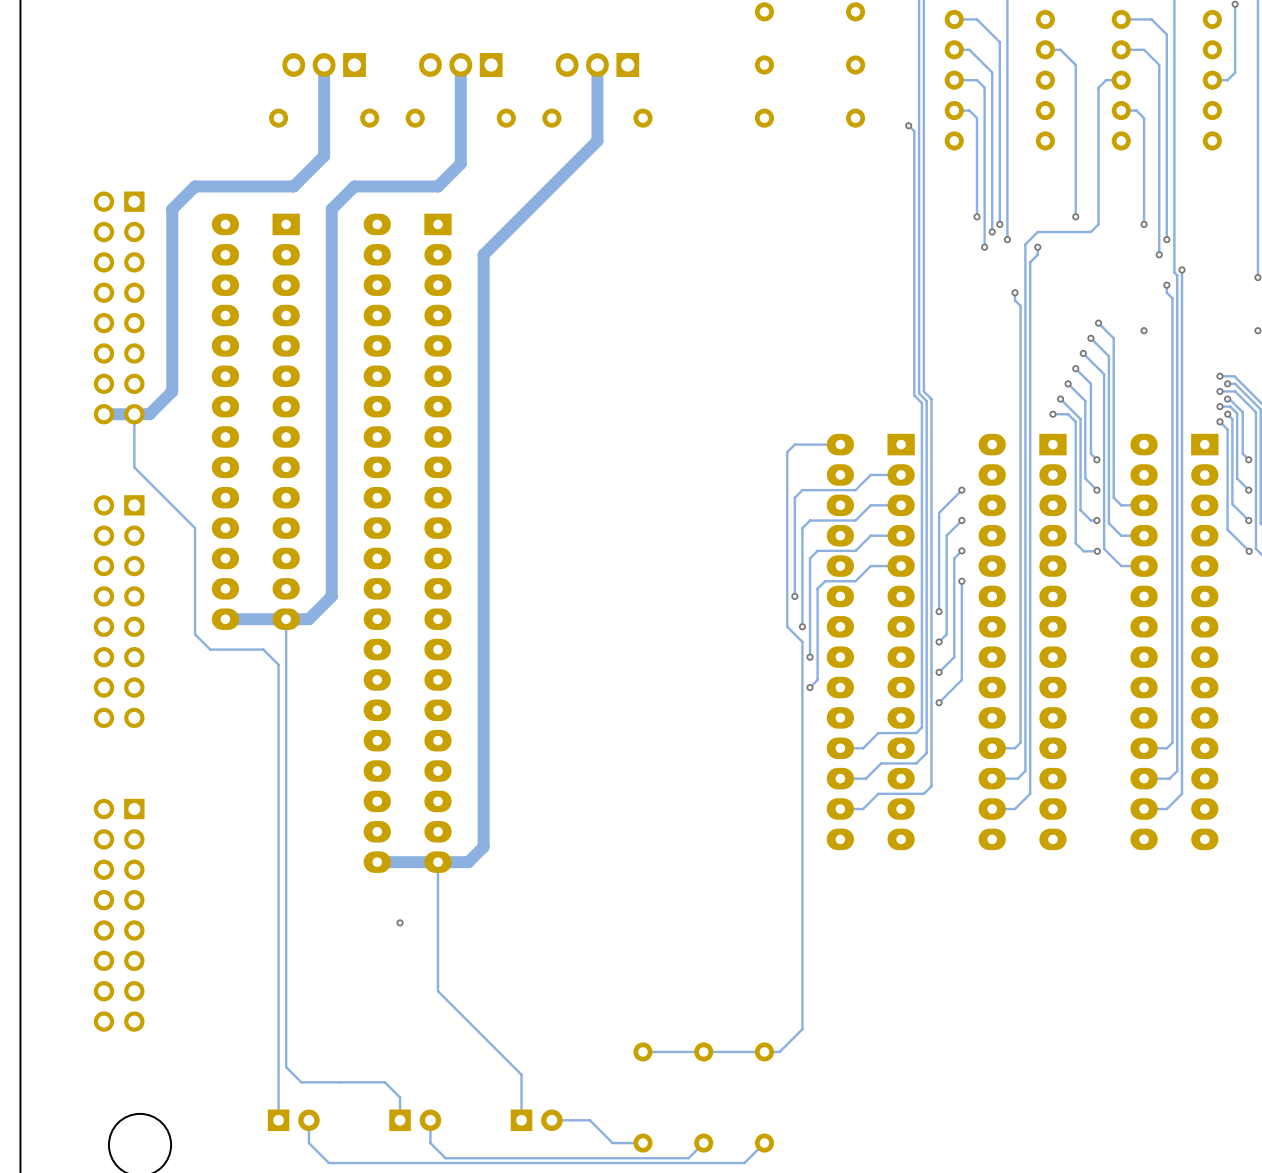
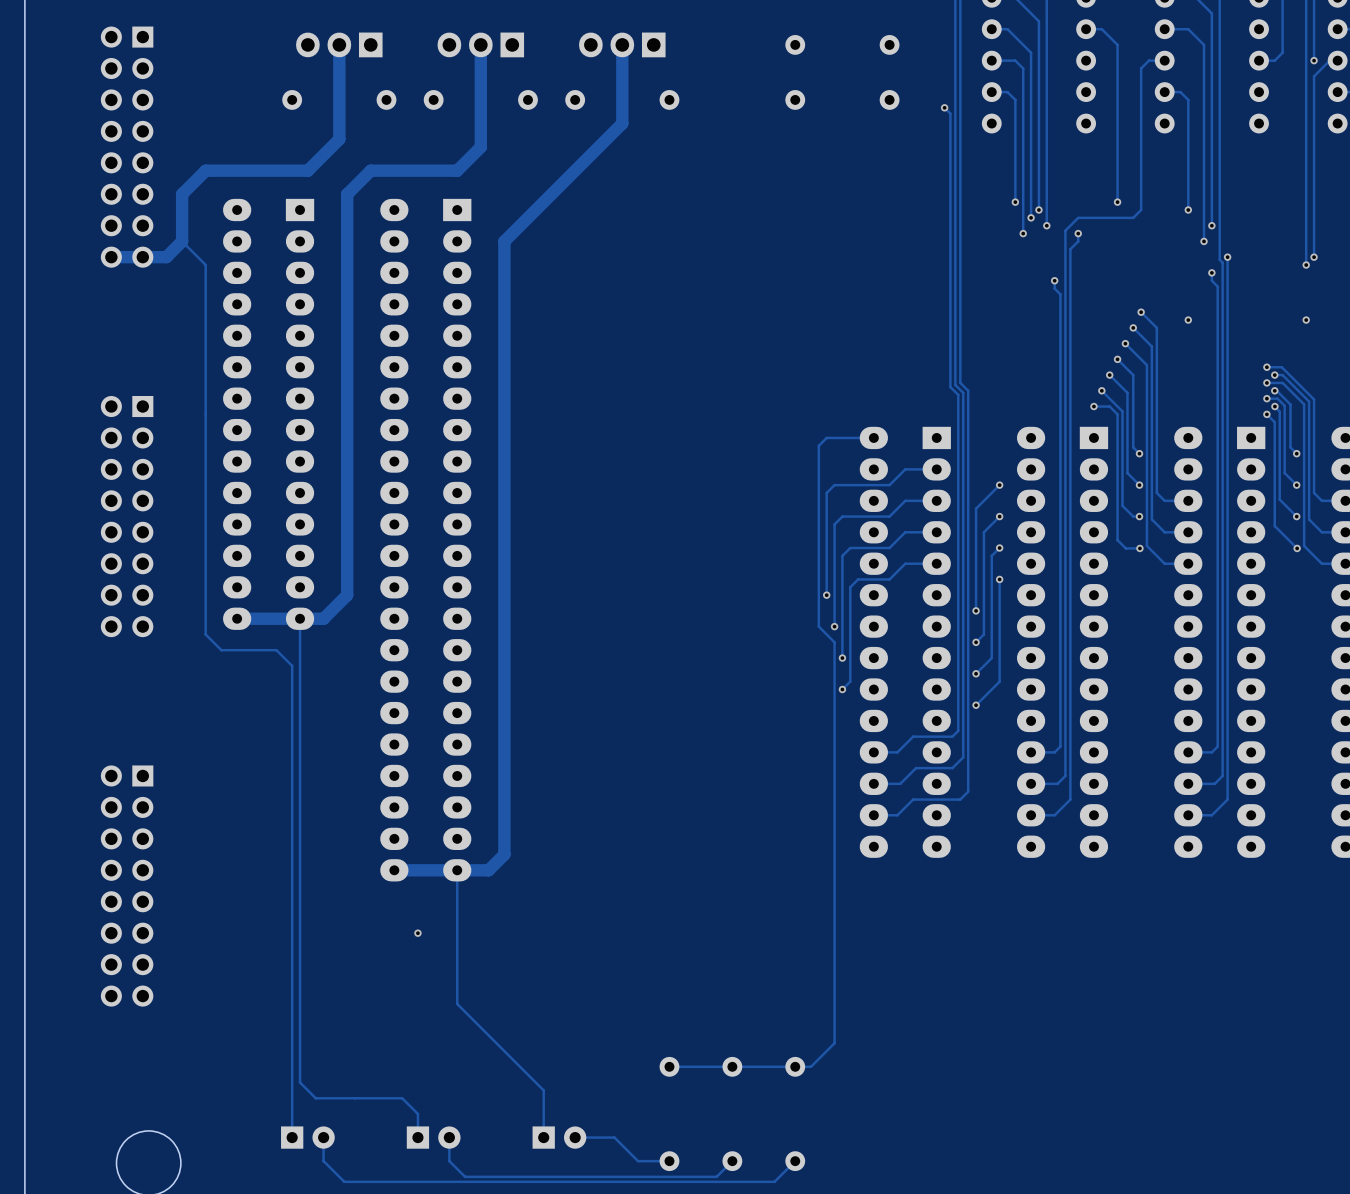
part: none -> (127, 147)
track: (172, 254) (172, 391) (149, 414) (103, 414) -> none
part: (119, 307) -> none
track: (134, 414) (134, 467) (195, 528) -> (111, 257) (166, 257) (182, 241) (205, 265) (205, 524)
part position: (119, 611) -> (127, 516)
part position: (119, 915) -> (127, 886)

